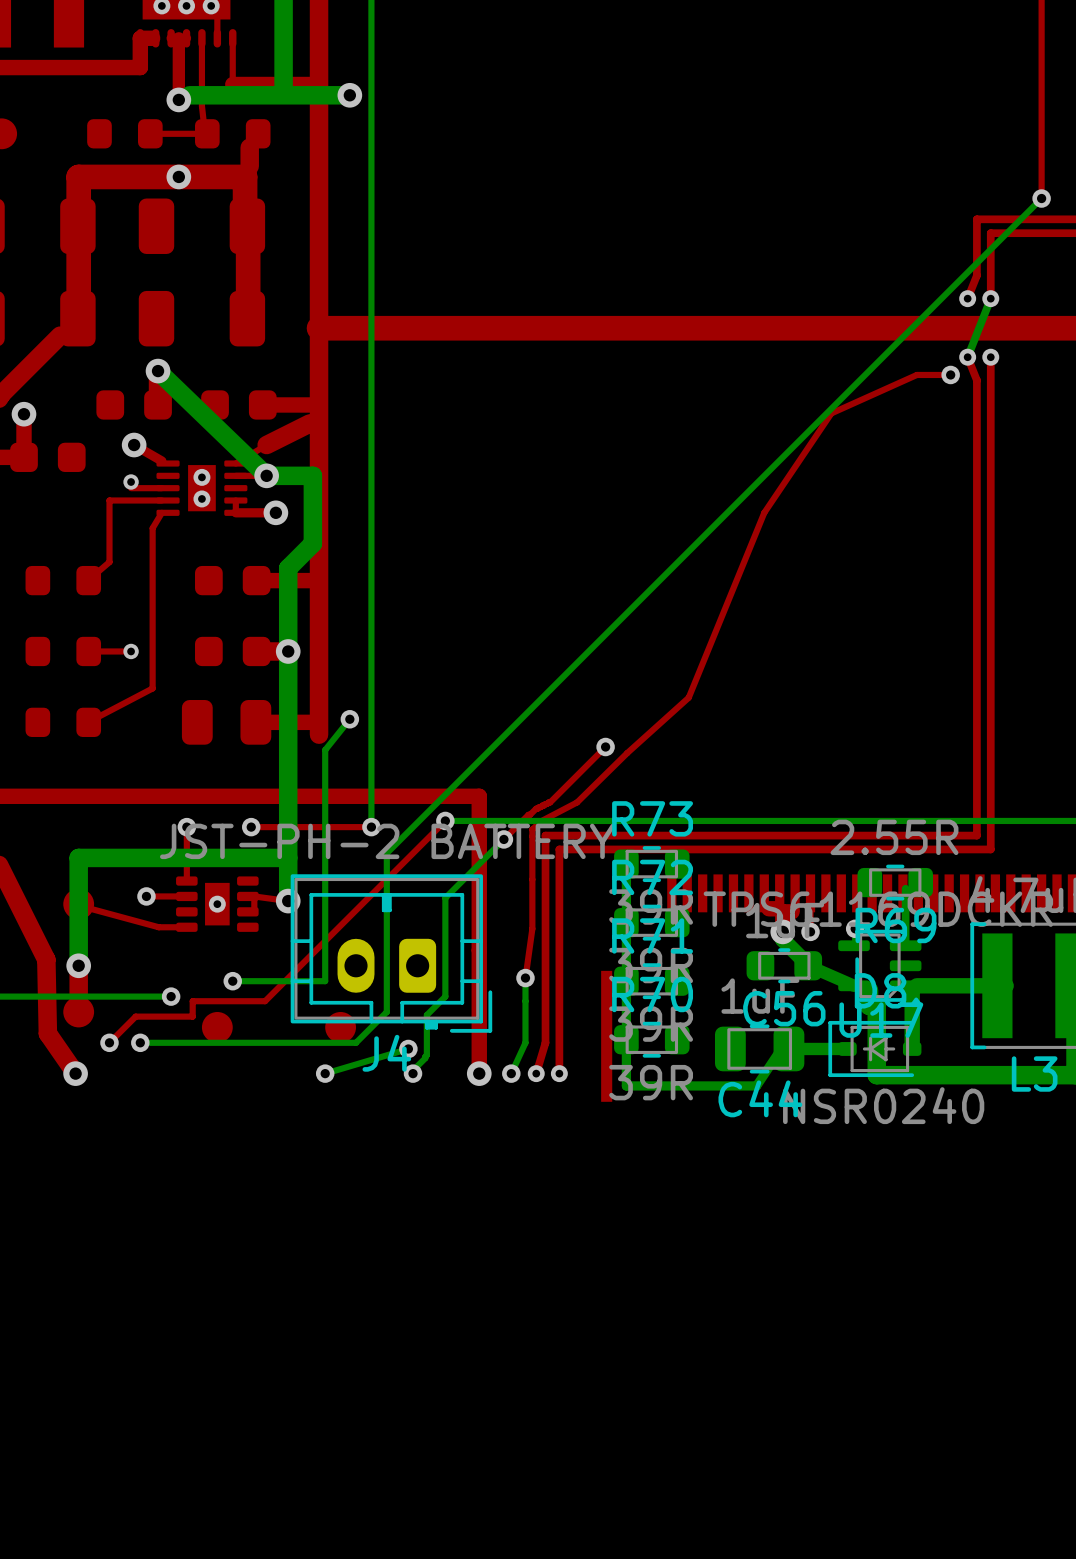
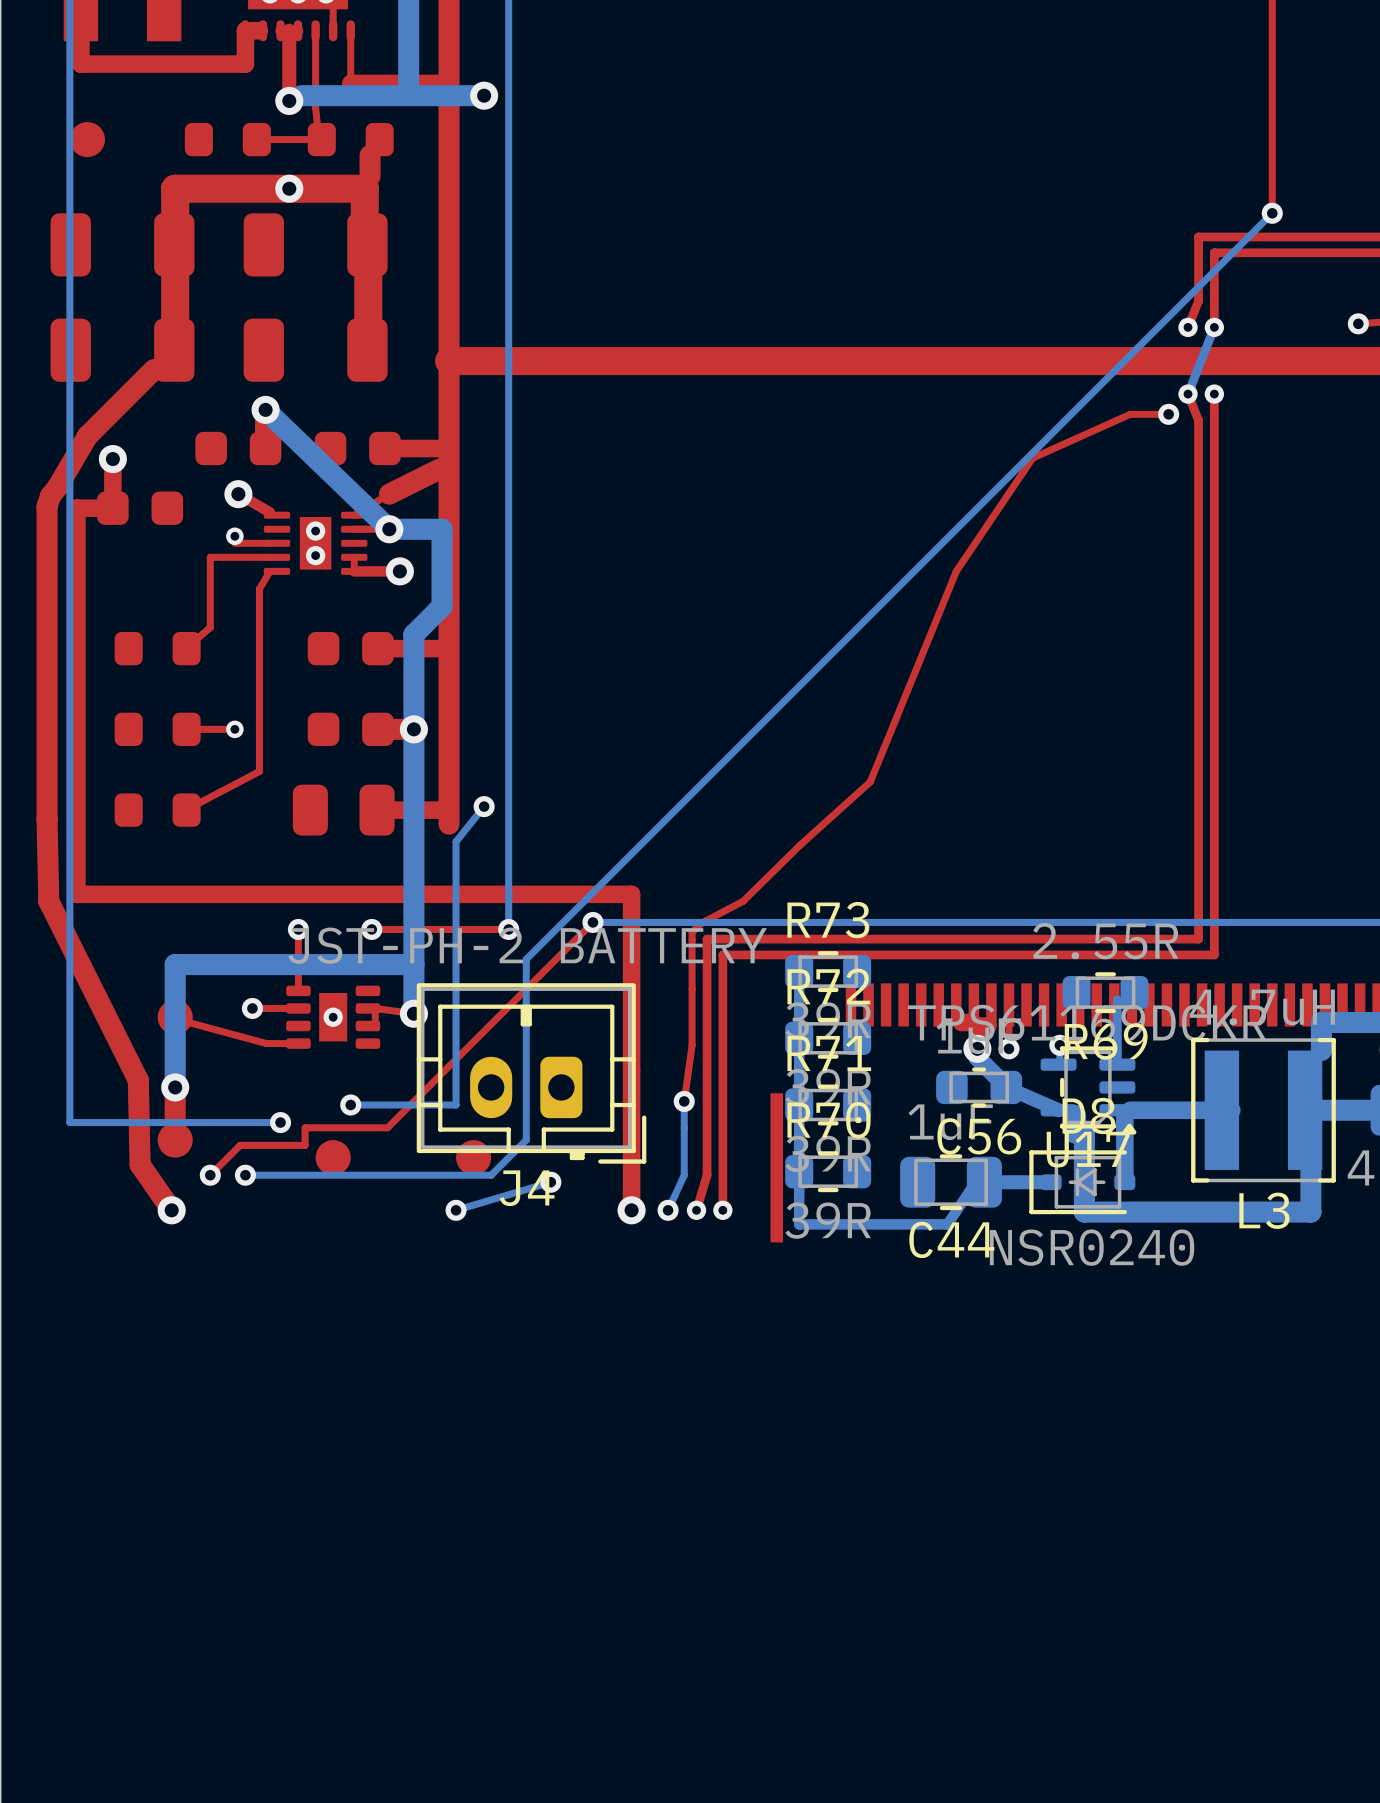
top track: (605, 747) (550, 802) (536, 808) (528, 814) (503, 839) -> none
via: (605, 747) -> none
bottom track: (503, 839) (445, 897) (445, 996) (426, 1015) (426, 1055) (413, 1070) (413, 1073) -> none
via: (503, 839) -> none
via: (413, 1073) -> none

